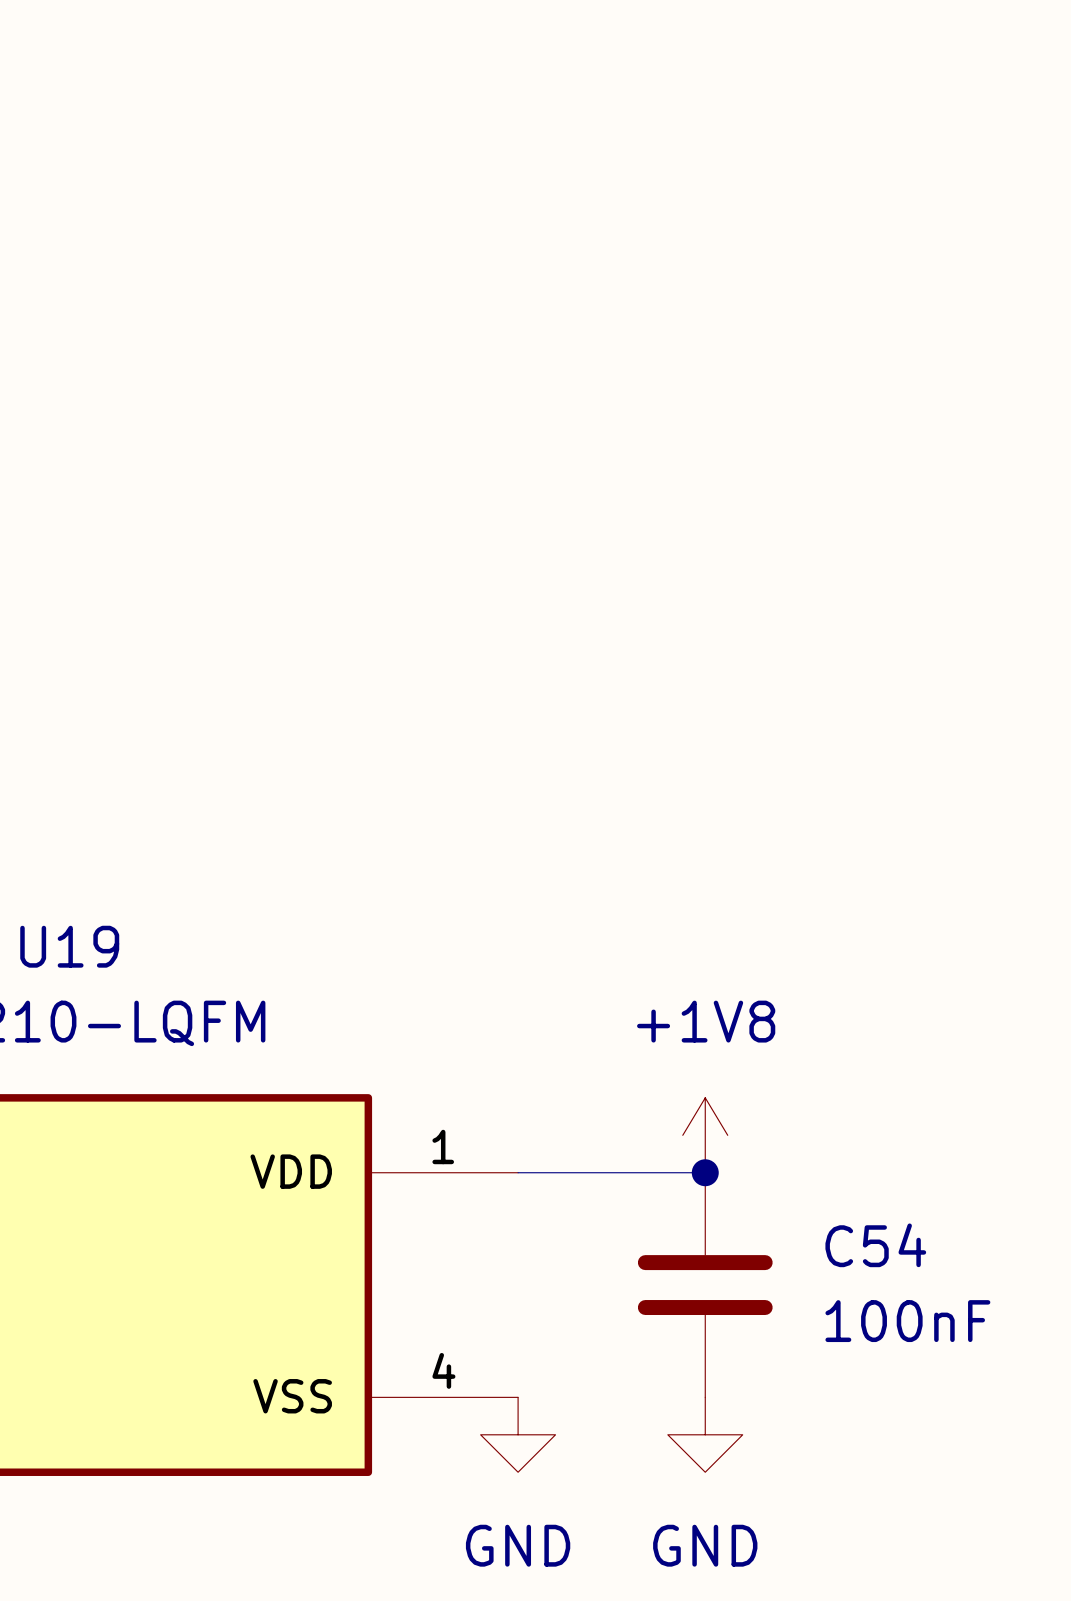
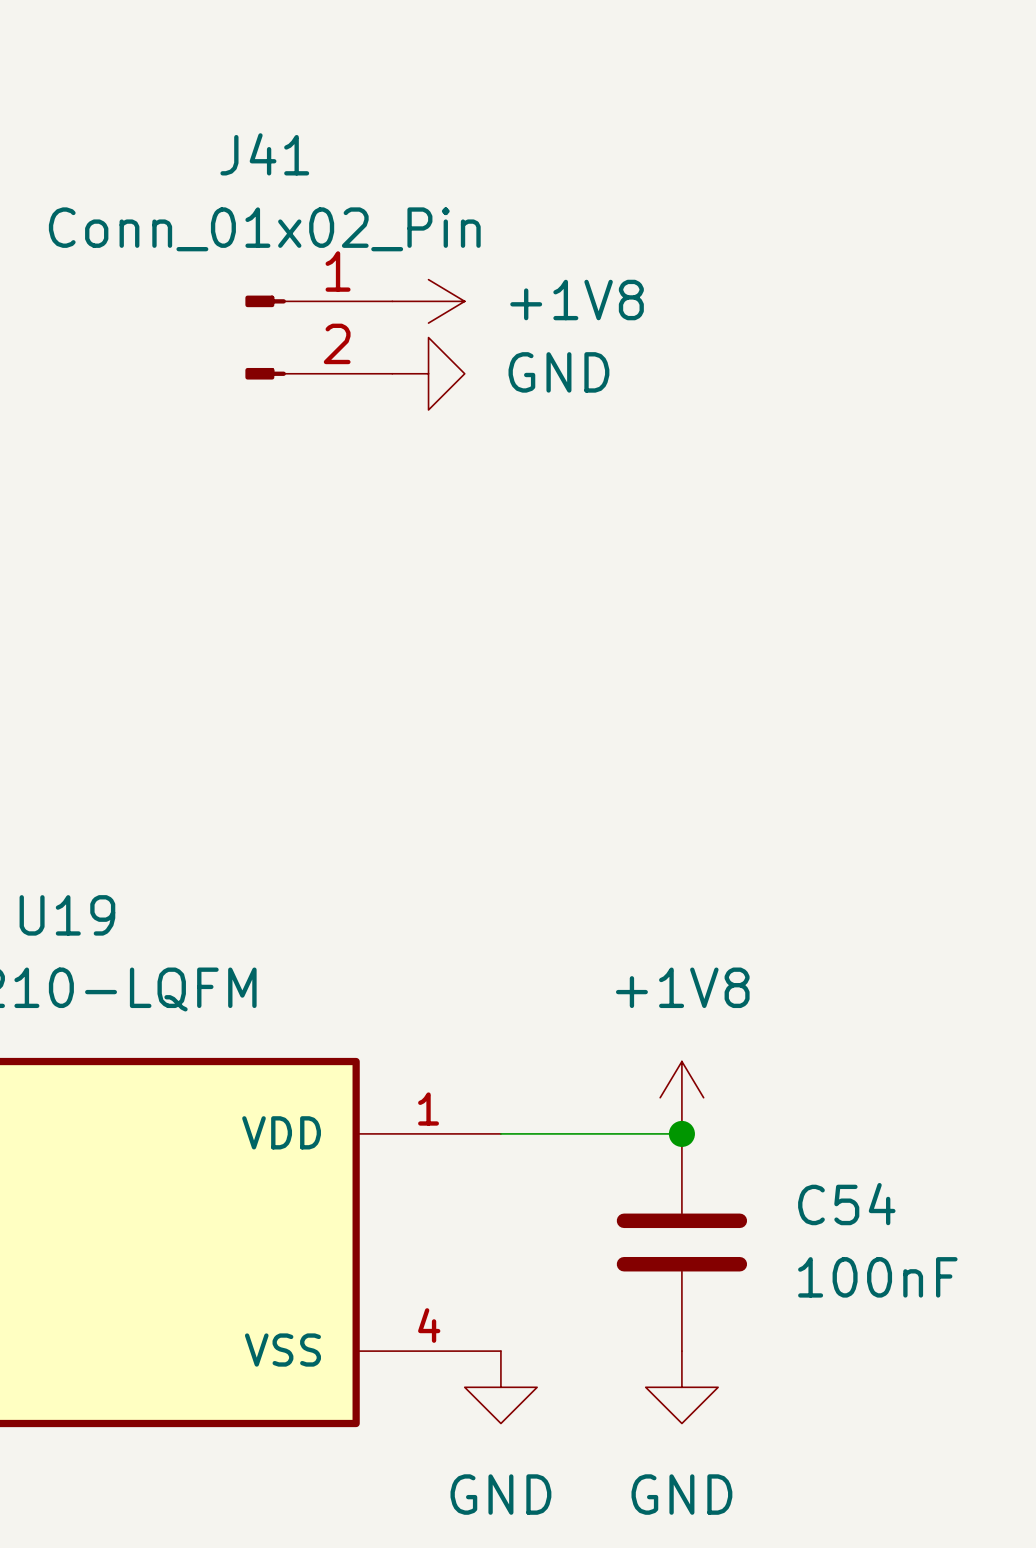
power symbol: none -> +1V8 (428, 301)
J41: none -> Conn_01x02_Pin (318, 337)
power symbol: none -> GND (428, 373)

